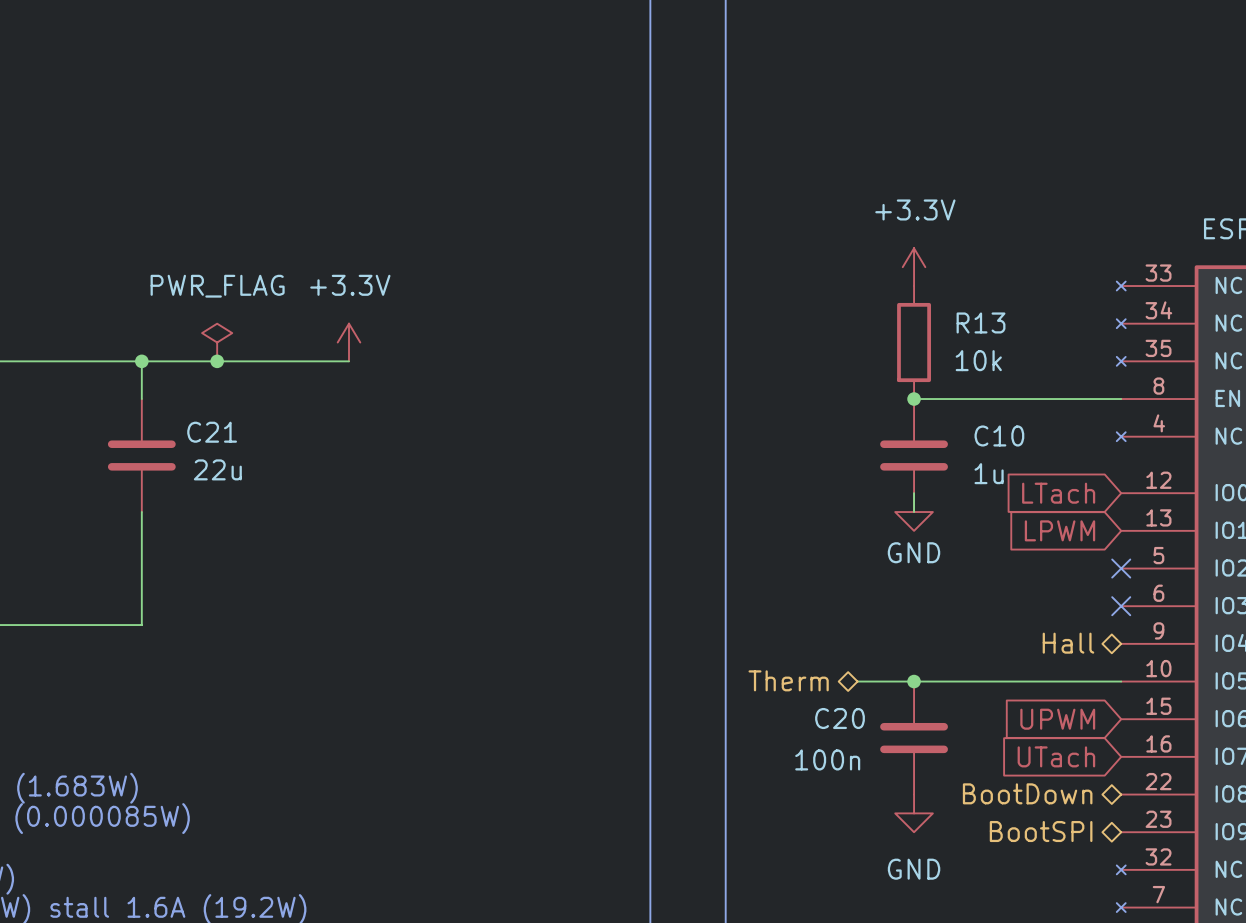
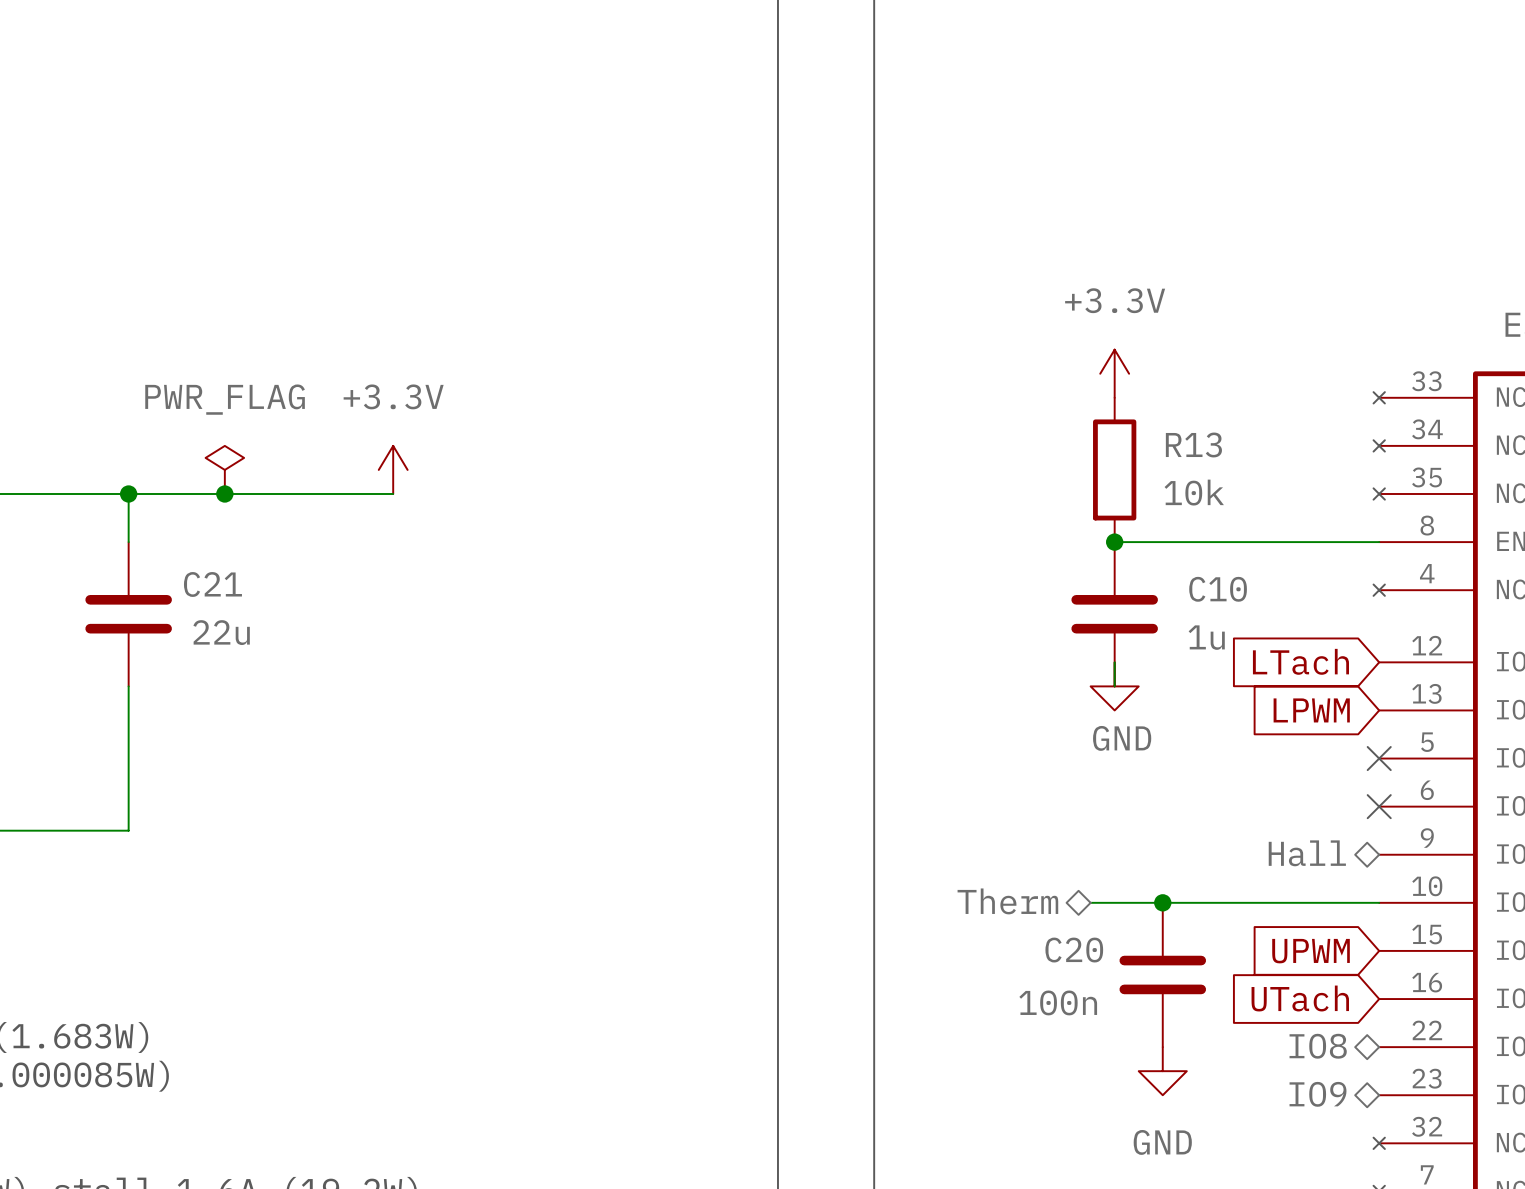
hierarchical label position: Therm (788, 680) -> Therm (1007, 901)
wire: (857, 681) (895, 681) -> none
junction position: (914, 681) -> (1162, 902)
C20 position: (914, 738) -> (1162, 974)
hierarchical label: BootDown (1027, 793) -> IO8 (1318, 1046)
power symbol position: GND (914, 813) -> GND (1162, 1071)
hierarchical label: BootSPI (1041, 831) -> IO9 (1318, 1094)

